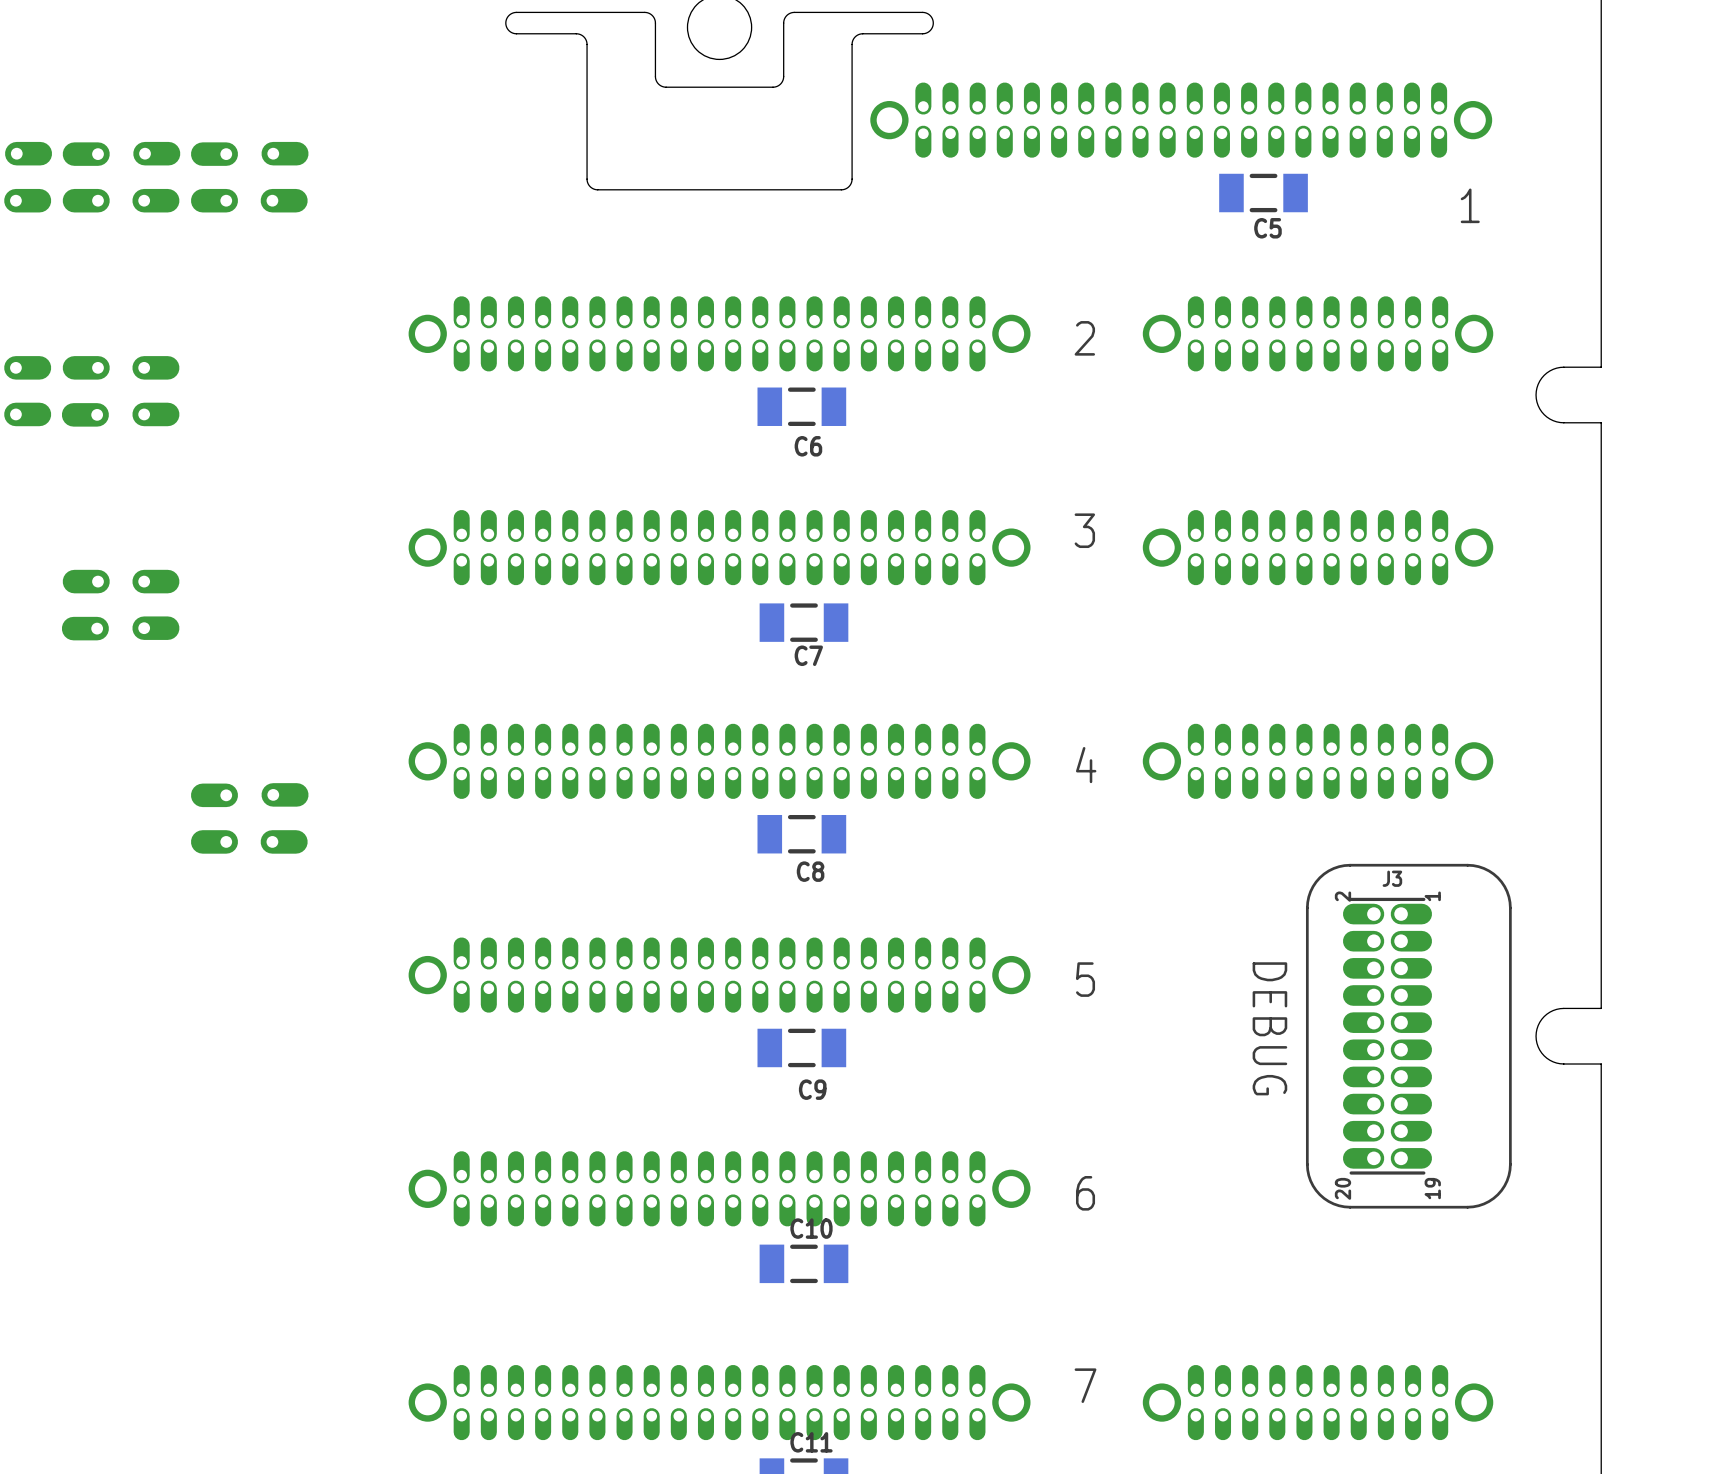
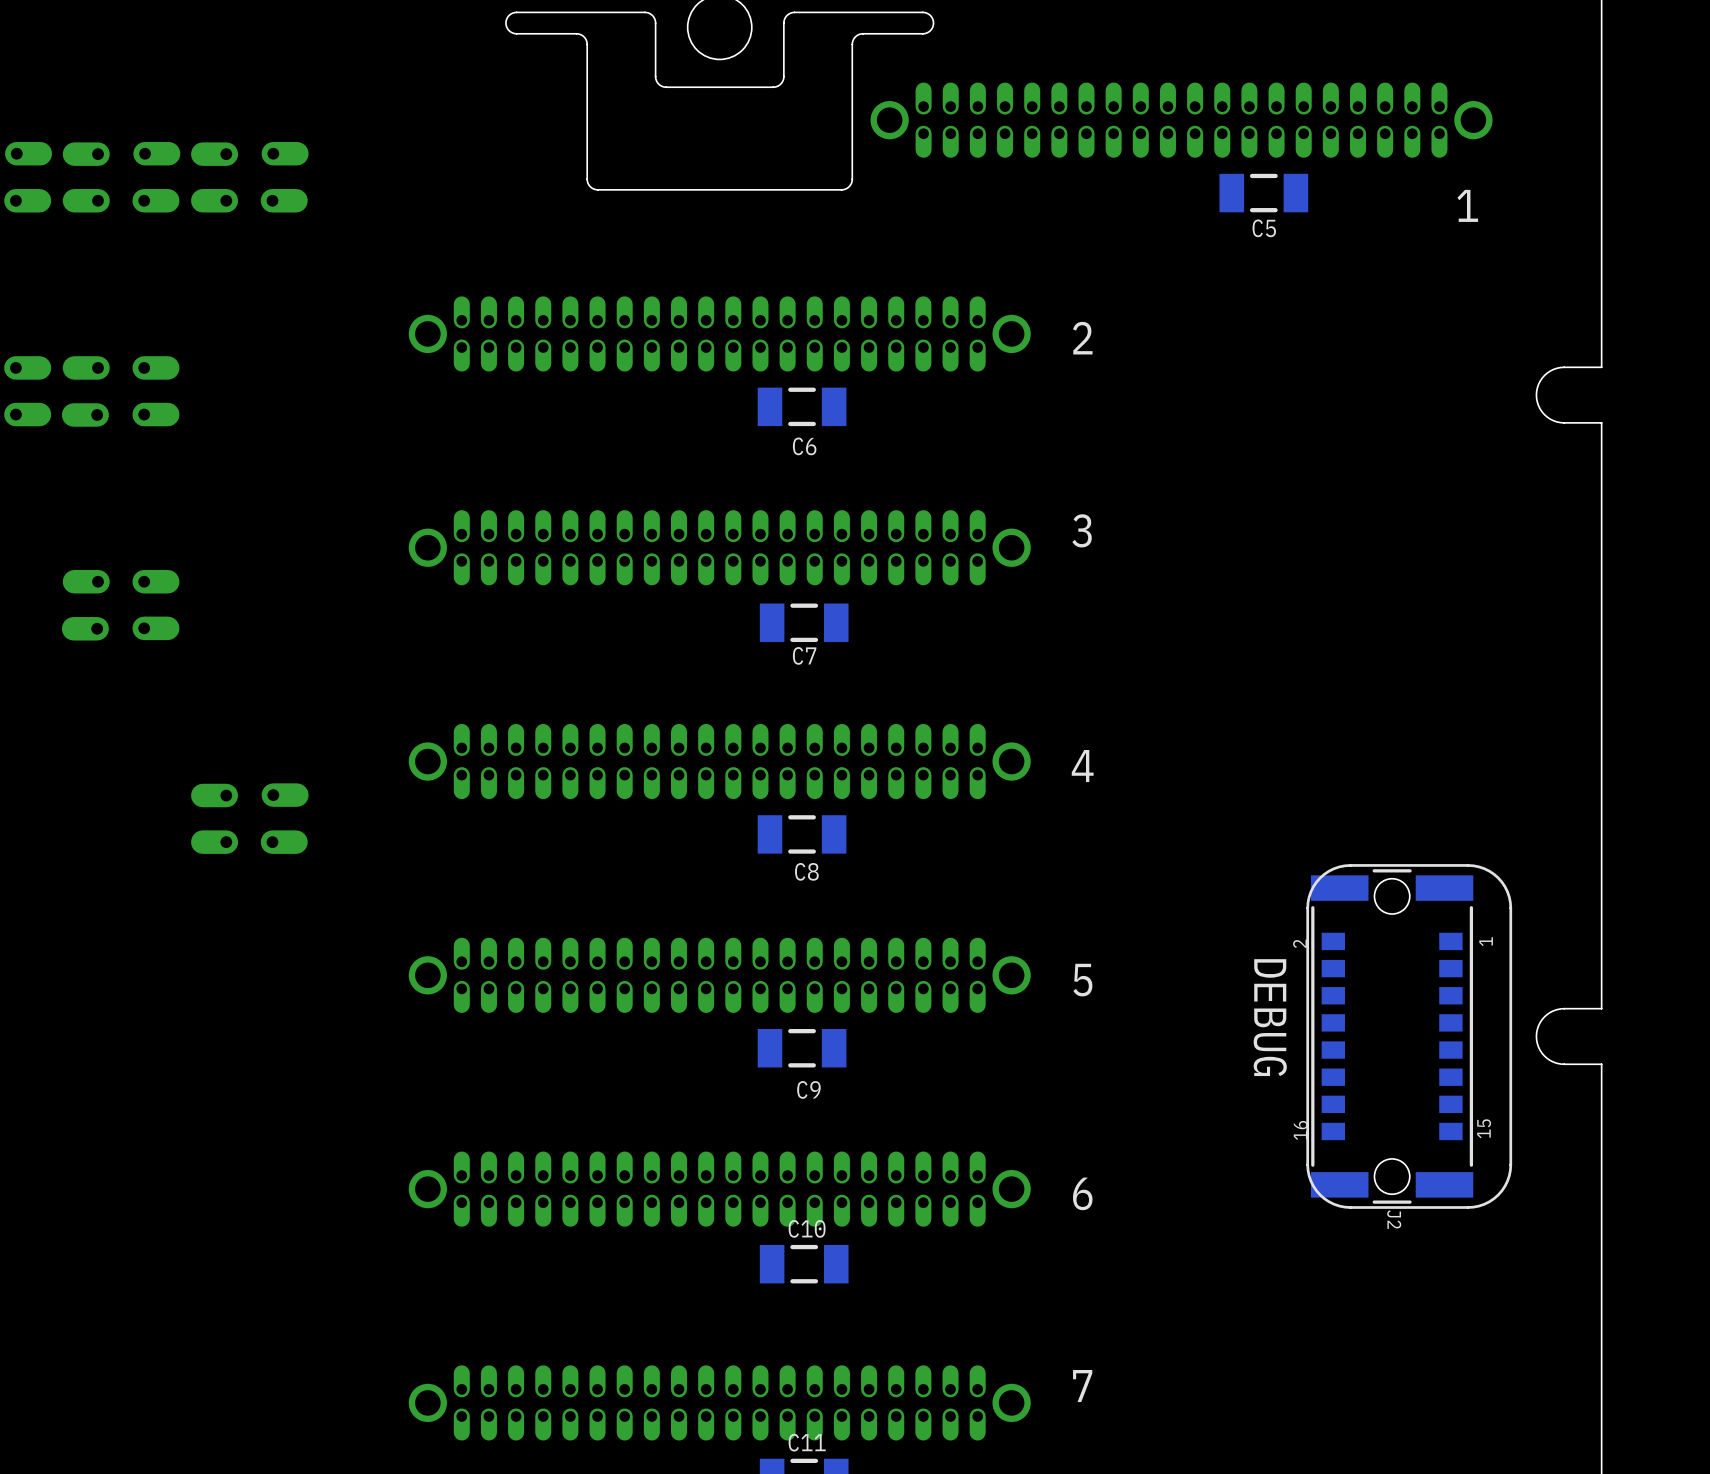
part: (1318, 333) -> none
part: (1318, 547) -> none
part: (1318, 761) -> none
J3: (1387, 1036) -> none
J2: none -> (1392, 1036)
part: (1318, 1402) -> none

